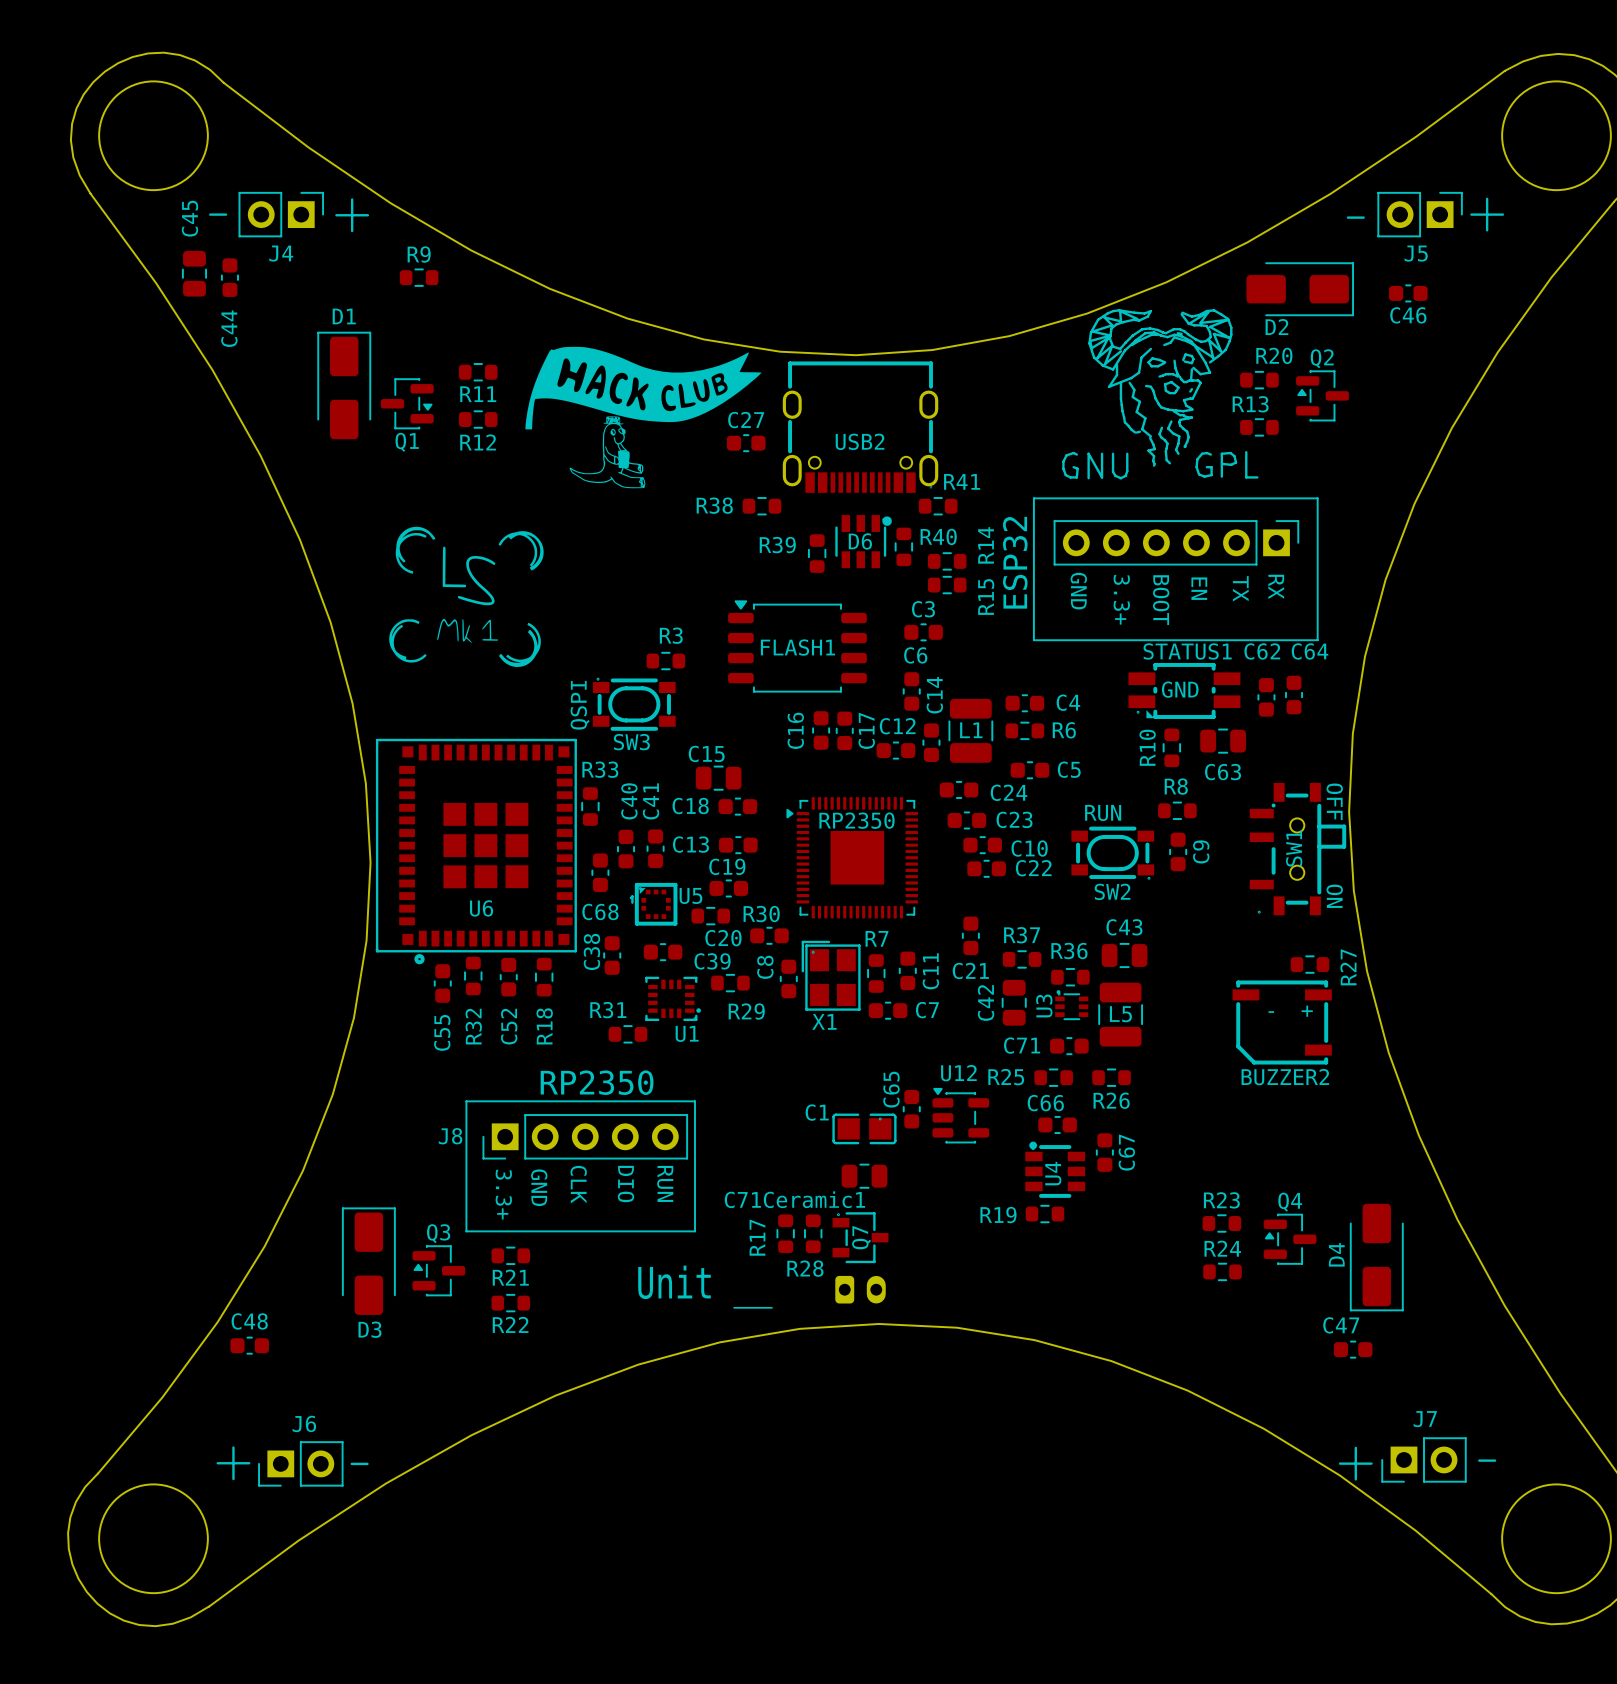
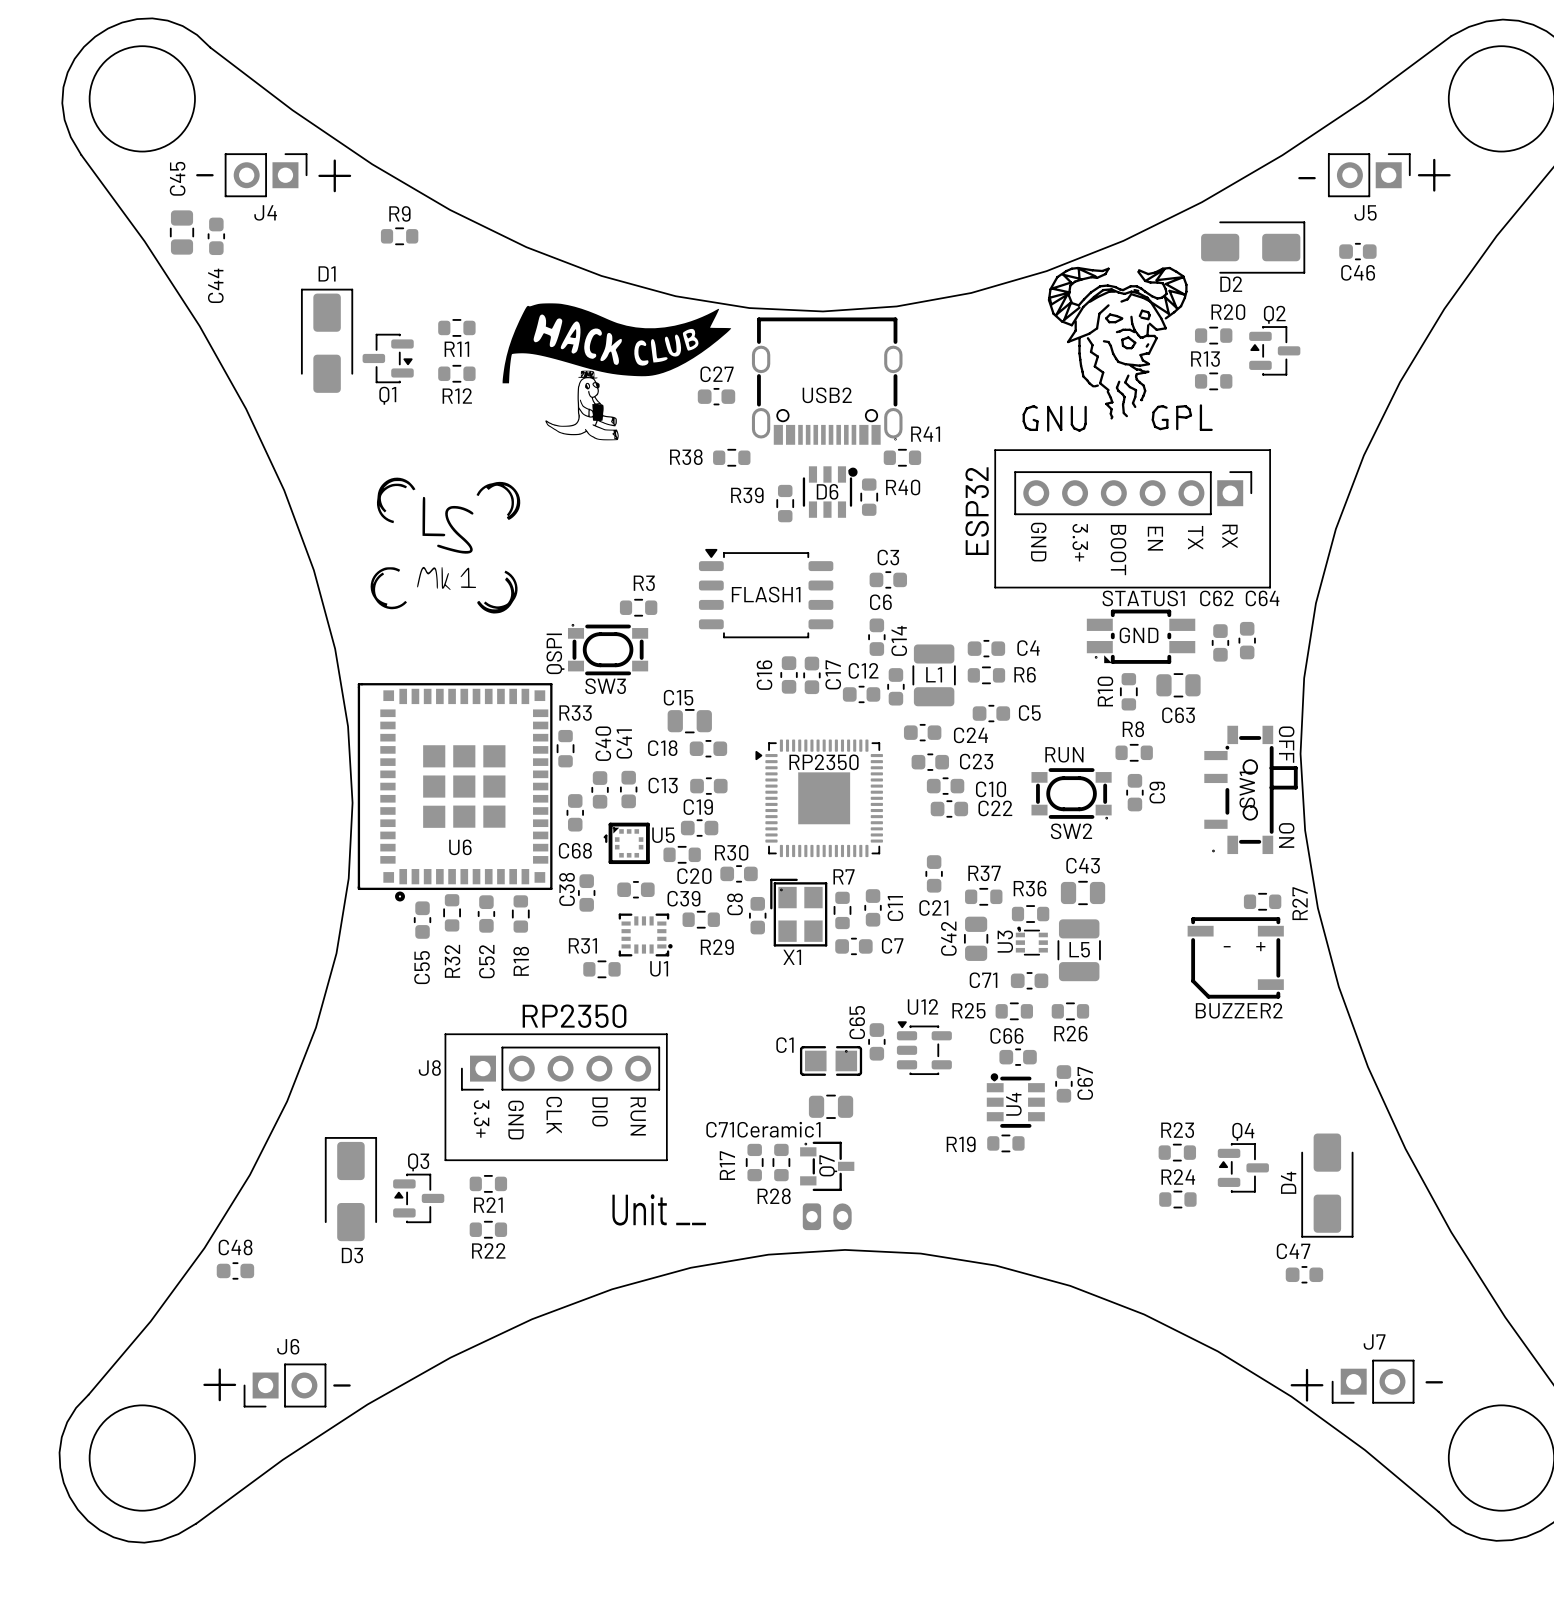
R14: (947, 561) -> none
R15: (947, 585) -> none

